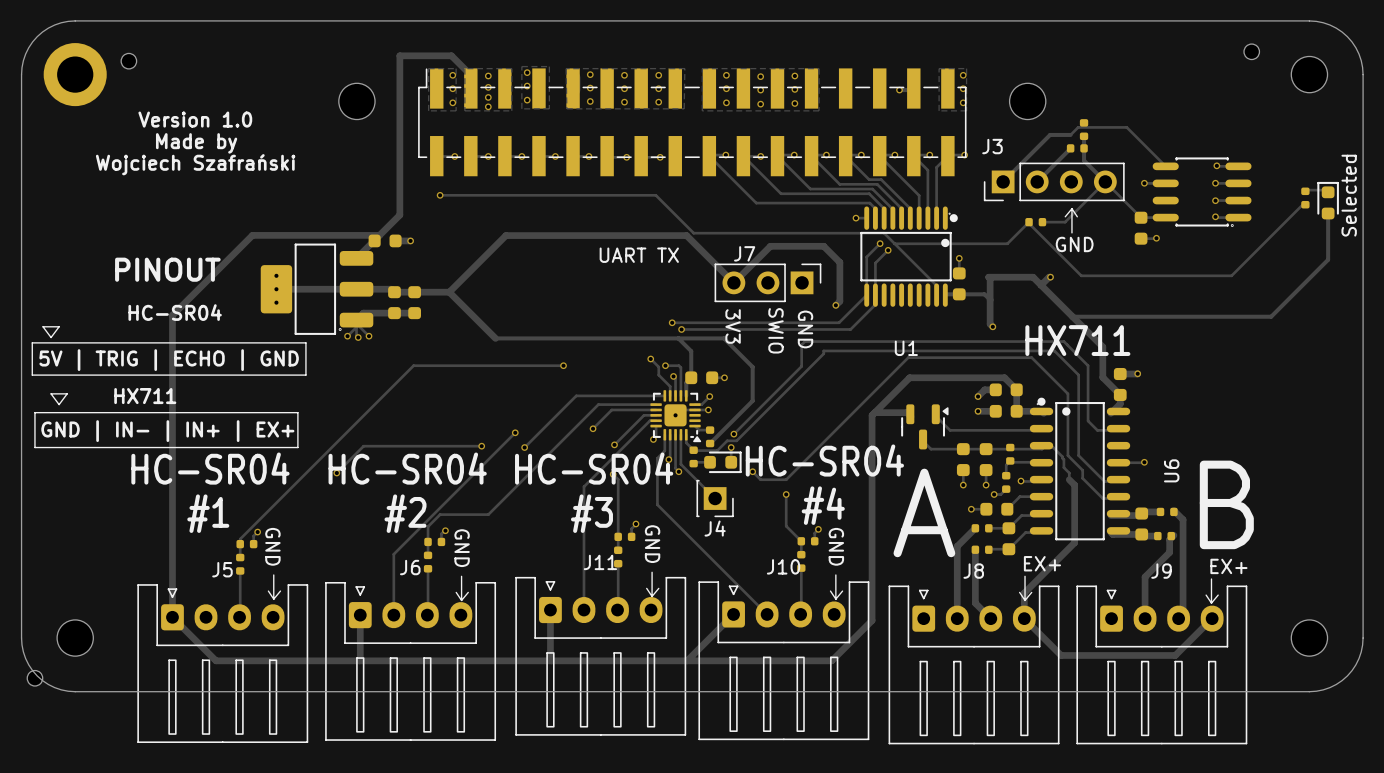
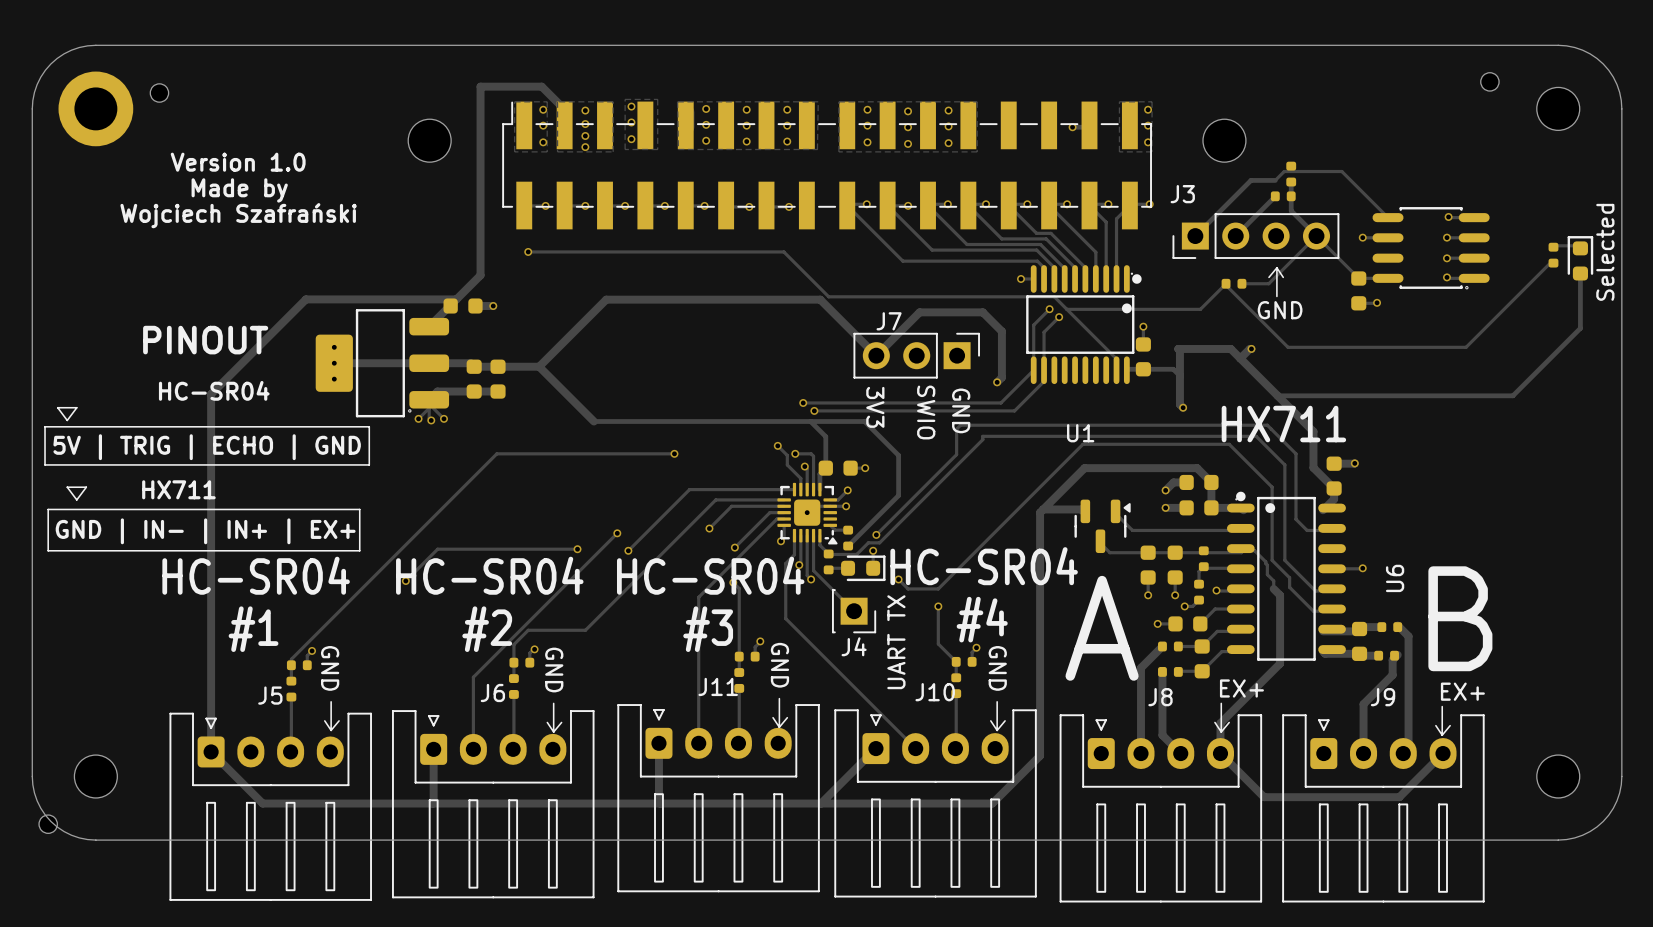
text rotation: 0° (639, 255) -> 90° counterclockwise (896, 642)
text position: UART TX (639, 255) -> UART TX (896, 642)

